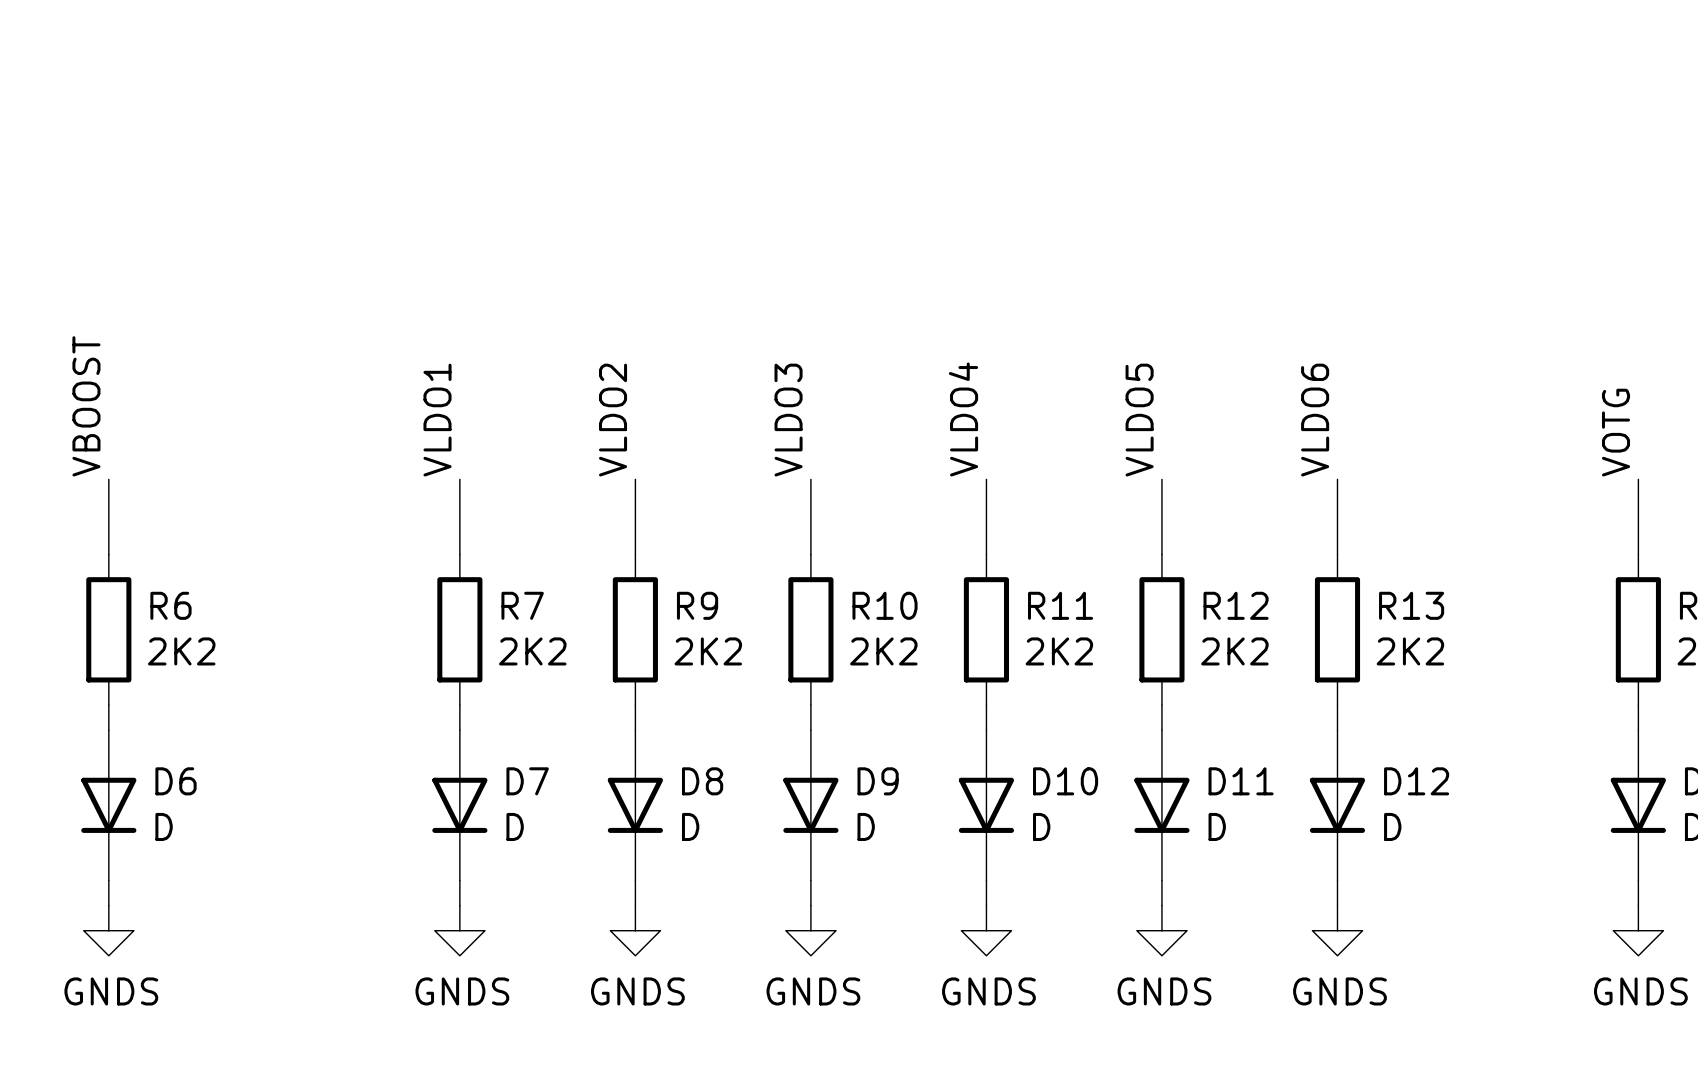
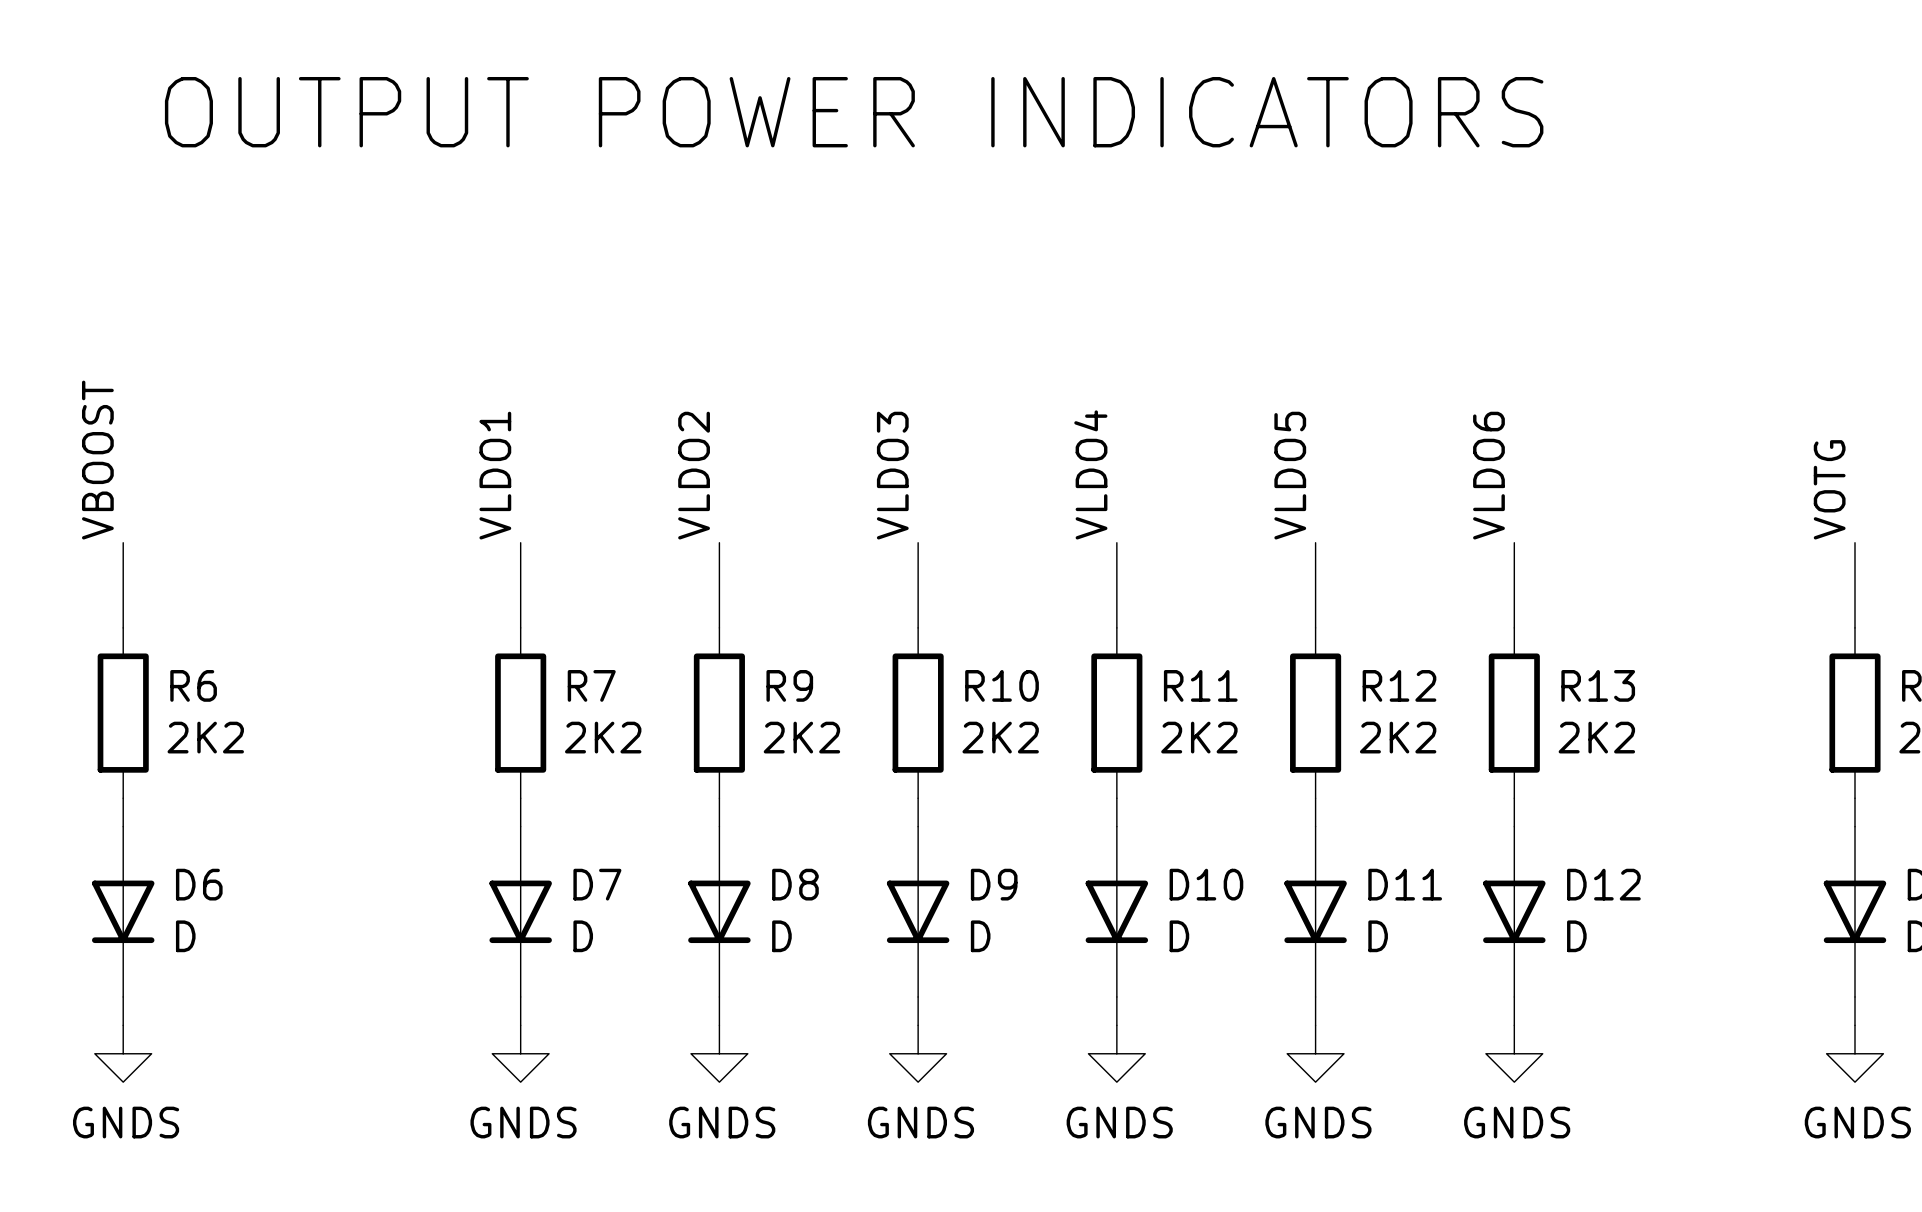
text: none -> OUTPUT POWER INDICATORS (854, 112)

